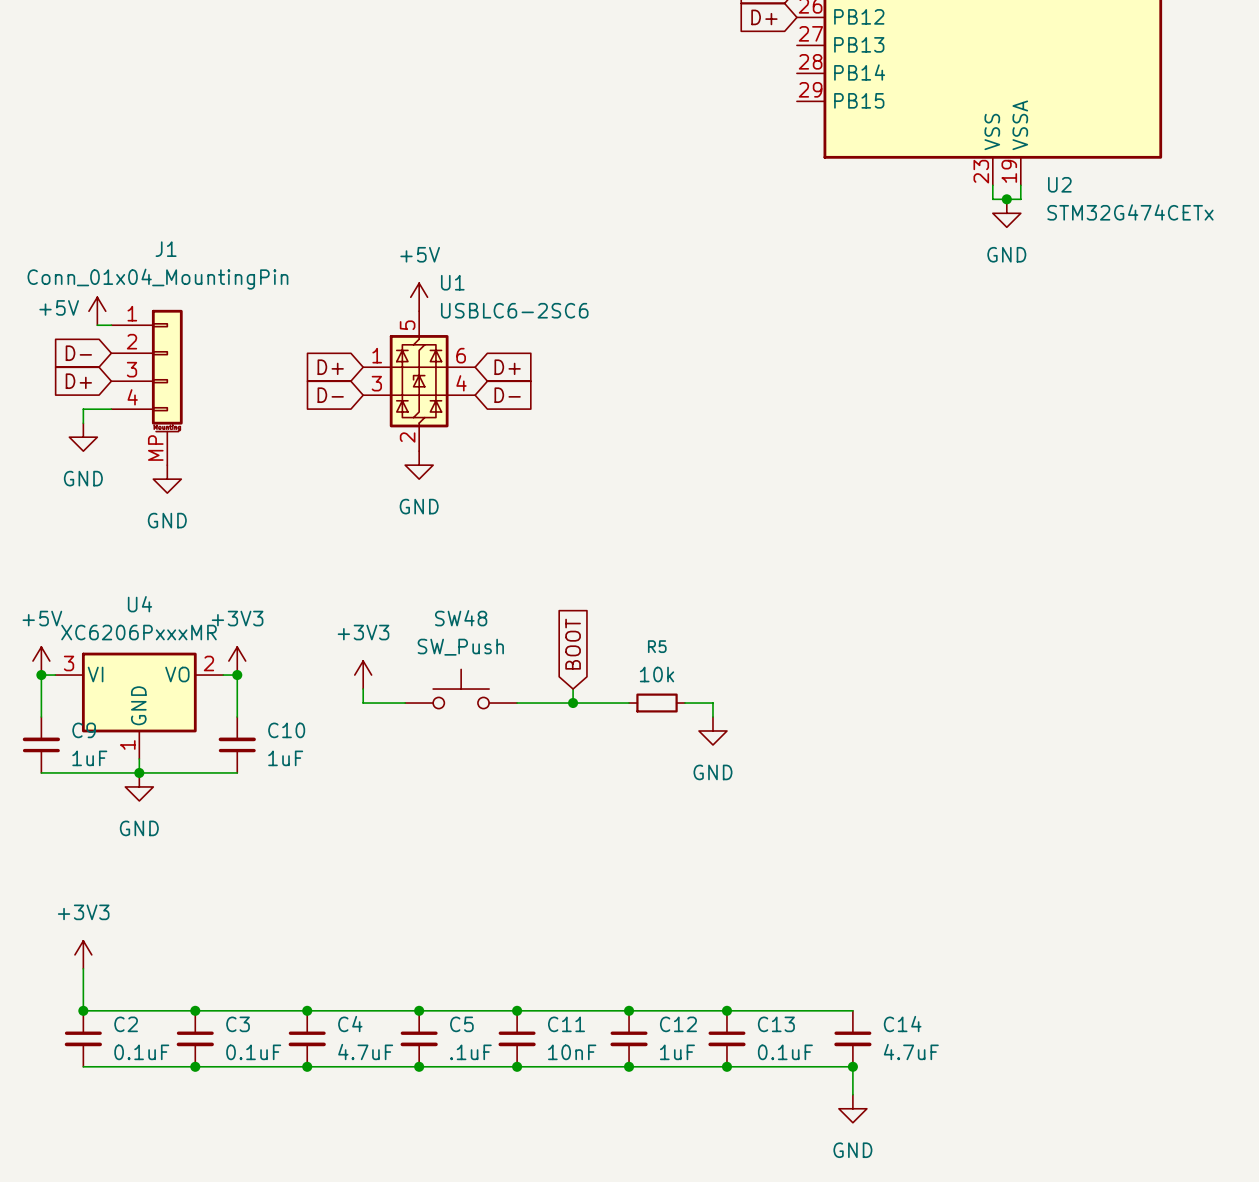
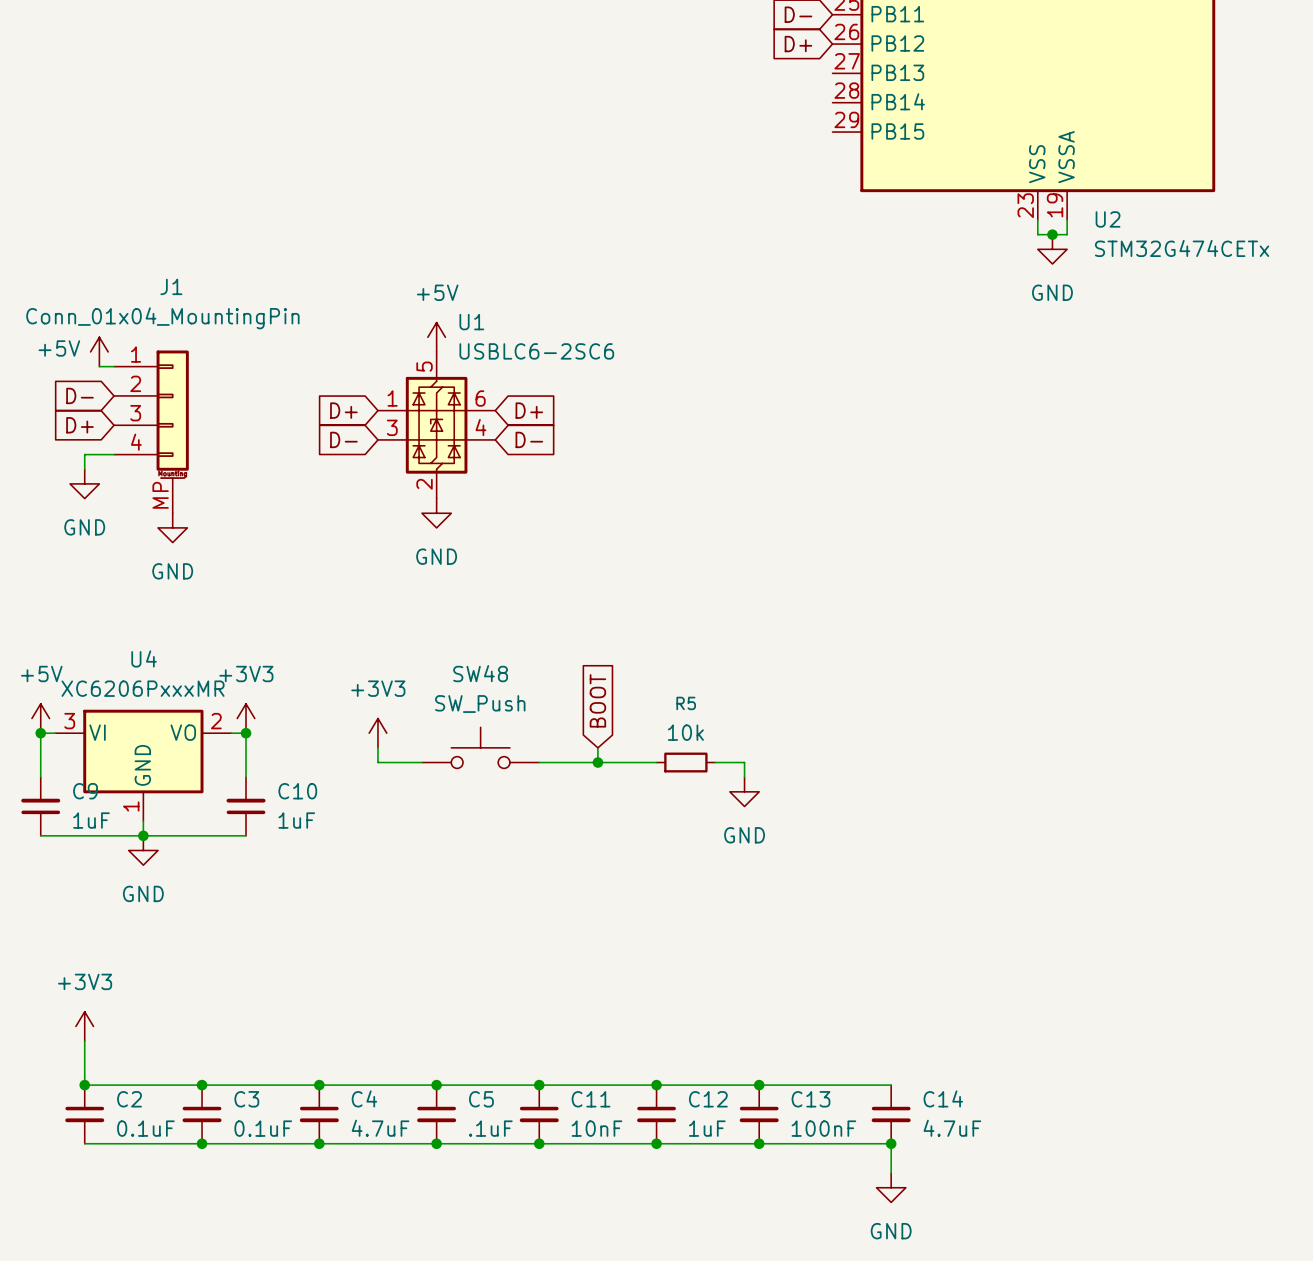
C13 value: 0.1uF (785, 1052) -> 100nF (823, 1128)

